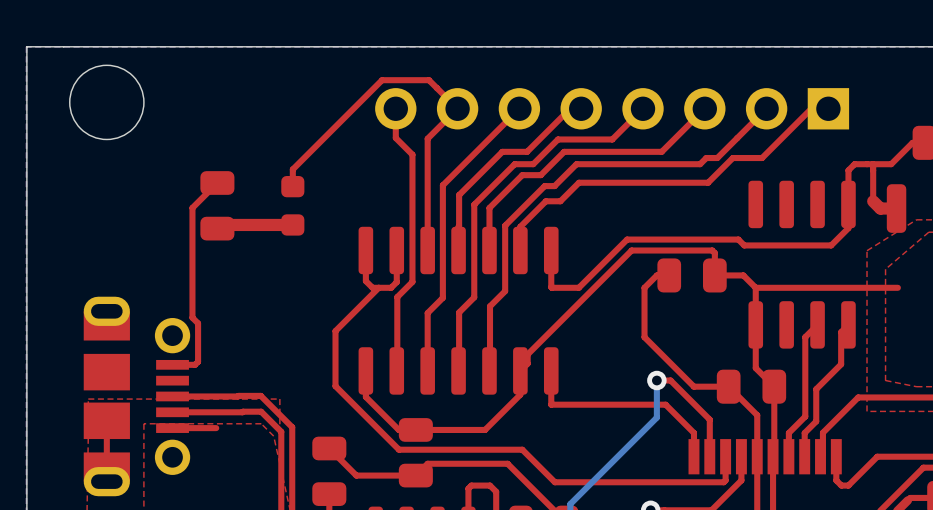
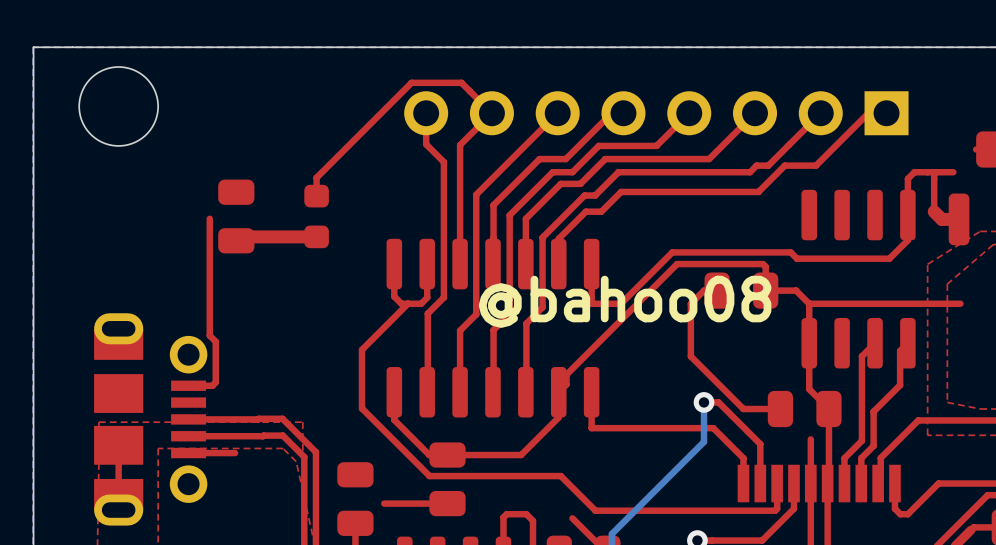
top track: (912, 142) (891, 164) -> none
top track: (217, 182) (192, 207) -> none
text: none -> @bahoo08 (625, 301)
top track: (728, 386) (757, 415) -> none
top track: (329, 448) (356, 475) -> none
top track: (415, 475) (427, 463) (507, 463) (533, 489) -> none

